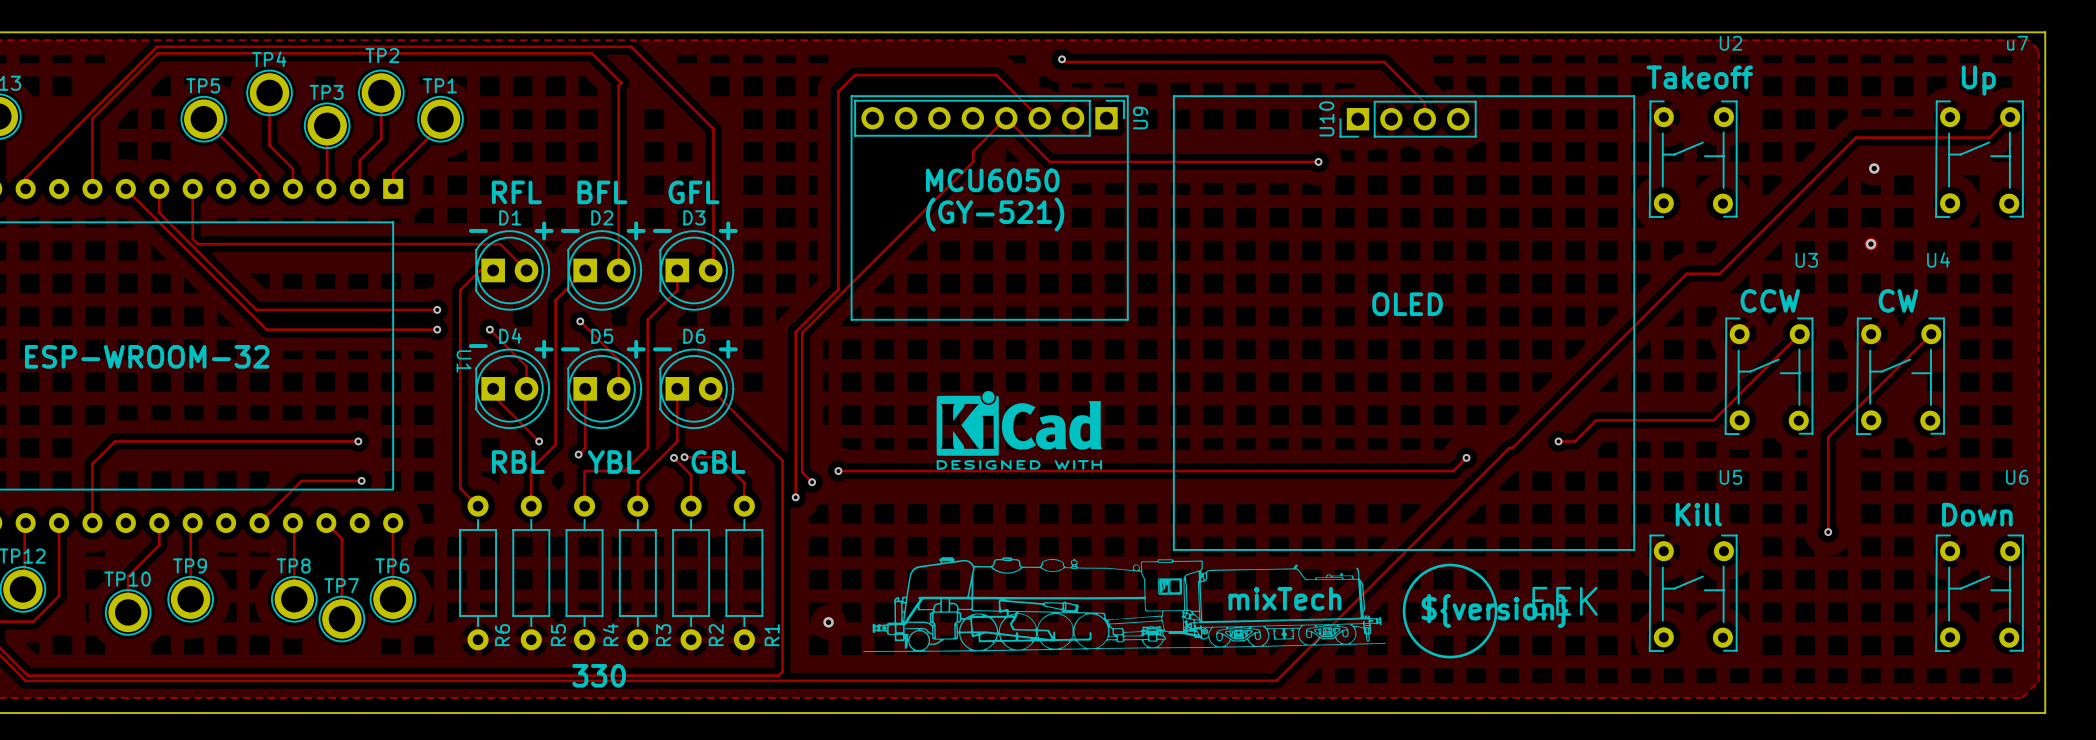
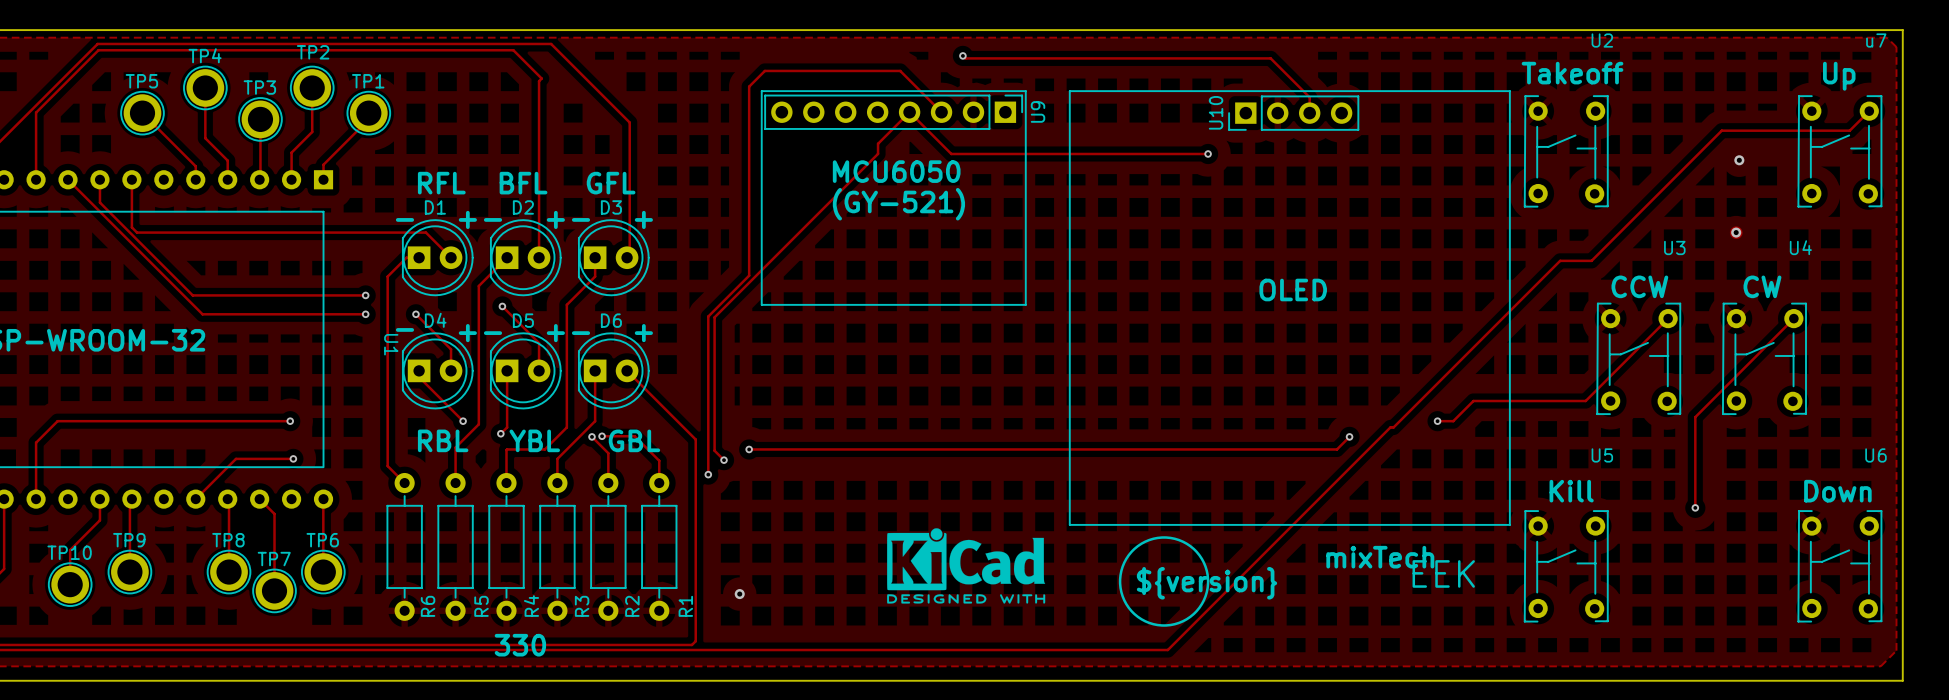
drawing position: (1019, 430) -> (966, 565)
drawing: [863, 557, 1386, 652] -> none
text position: mixTech (1284, 598) -> mixTech (1380, 557)
drawing position: (1450, 611) -> (1164, 581)
text position: ${version} (1494, 611) -> ${version} (1206, 583)

